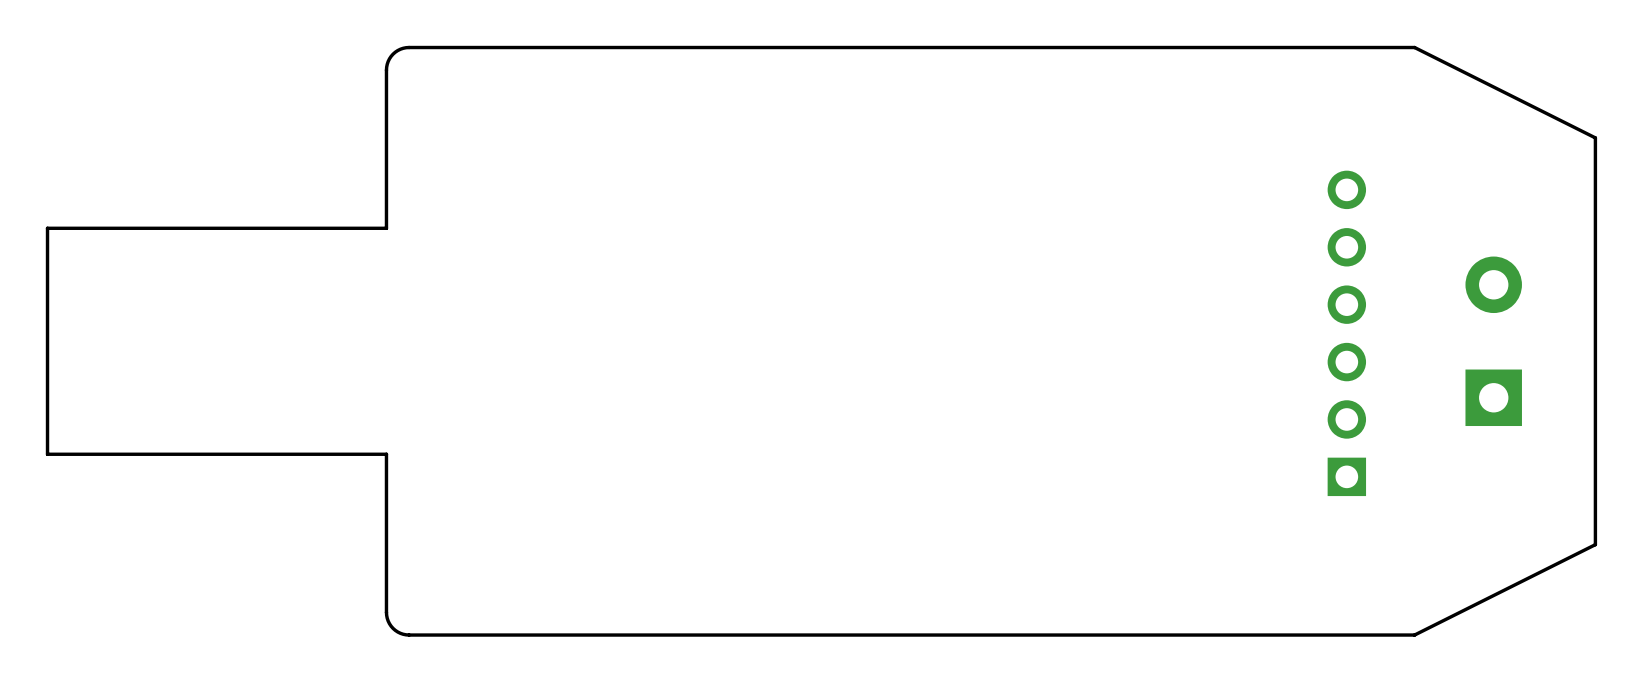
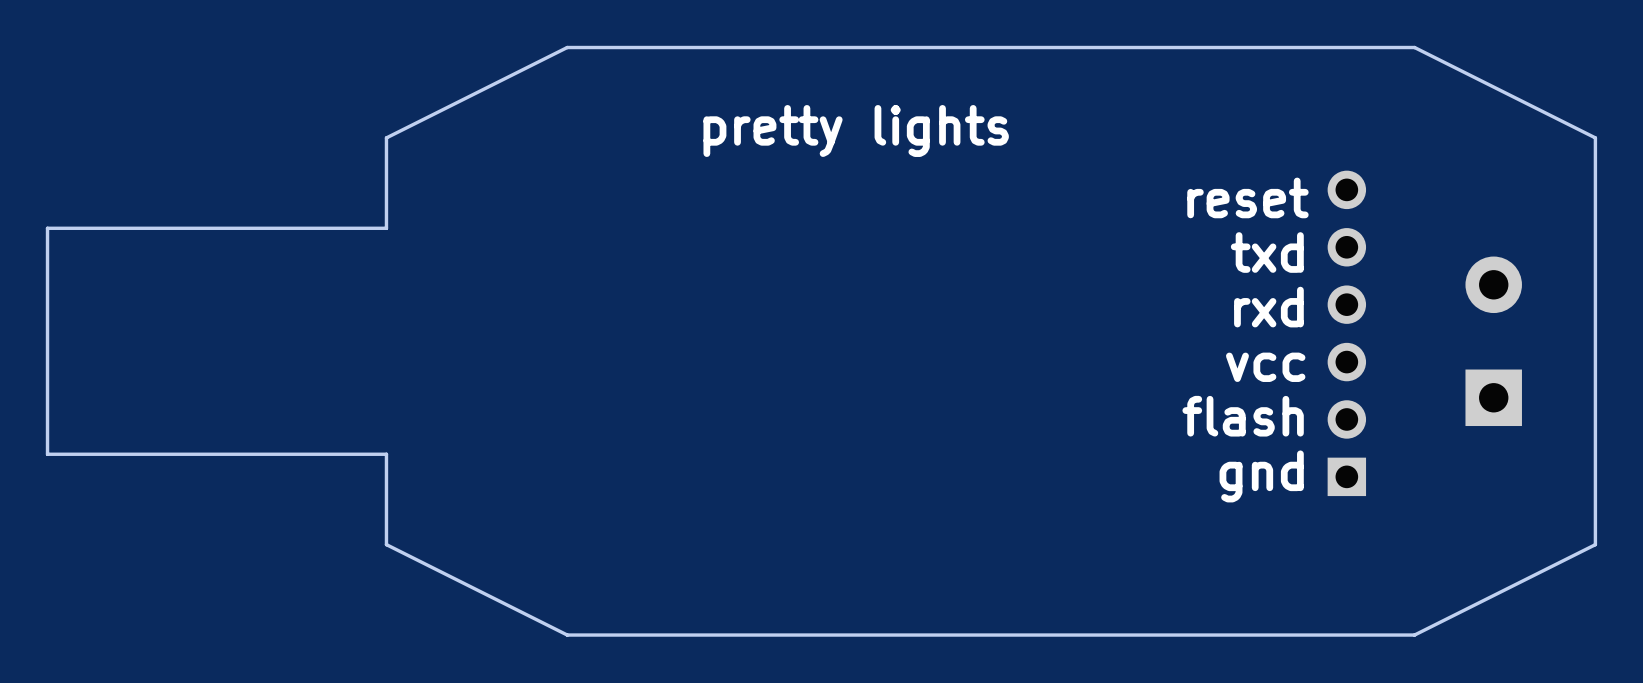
board edge: (567, 47) (409, 47) (397, 50) (391, 56) (386, 67) (386, 137) -> (567, 47) (386, 137)
text: none -> pretty lights (856, 130)
text: none -> reset (1247, 197)
text: none -> txd (1267, 252)
text: none -> rxd (1268, 307)
text: none -> vcc (1265, 367)
text: none -> flash (1243, 416)
text: none -> gnd (1261, 476)
board edge: (386, 544) (386, 615) (391, 626) (397, 632) (409, 635) (567, 635) -> (386, 544) (567, 635)

